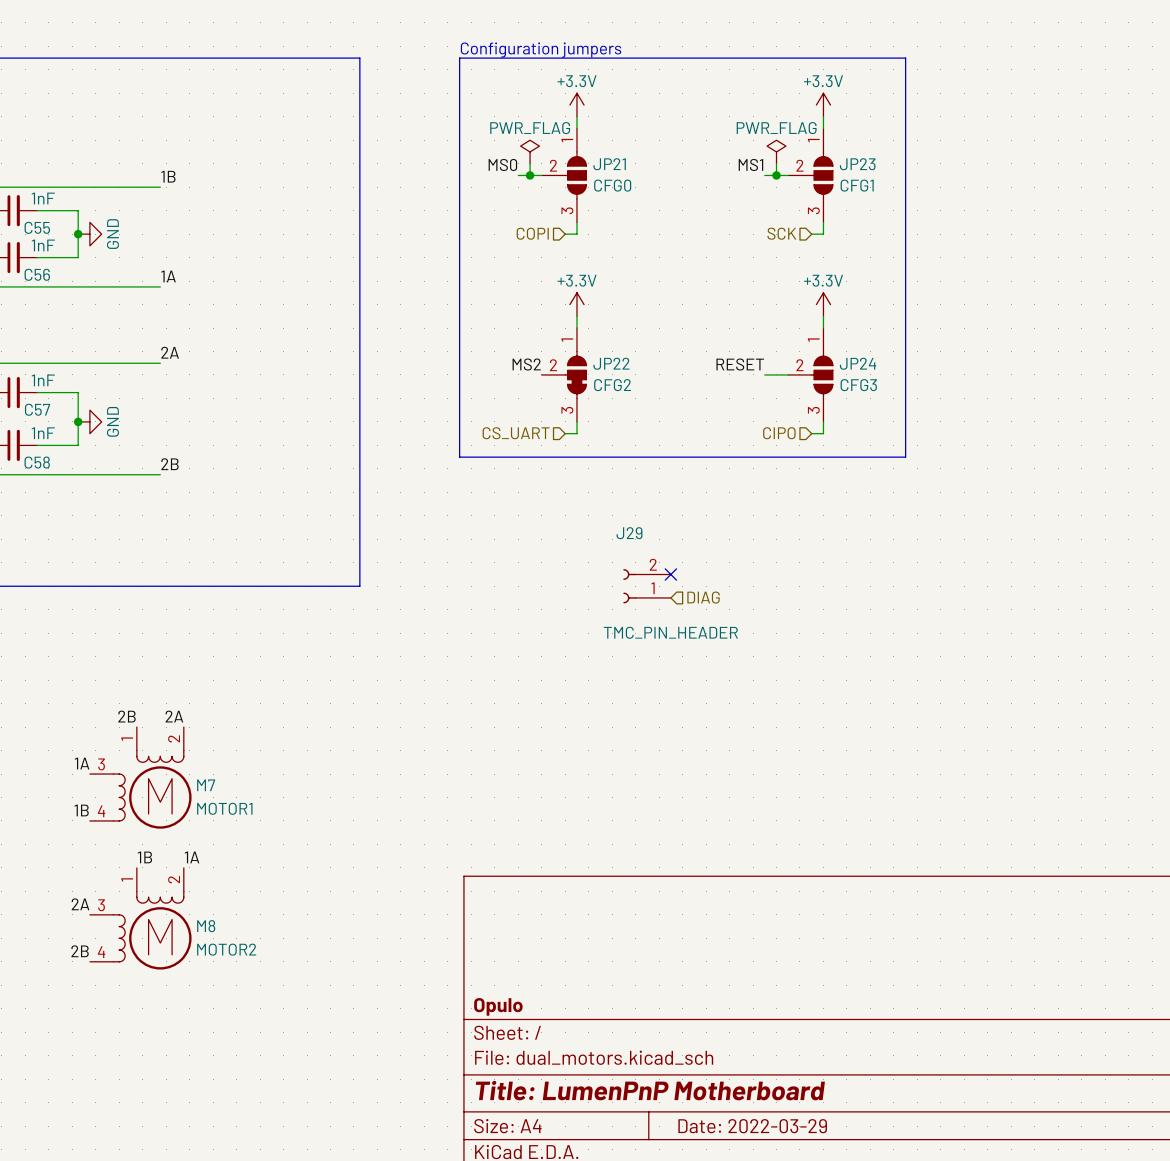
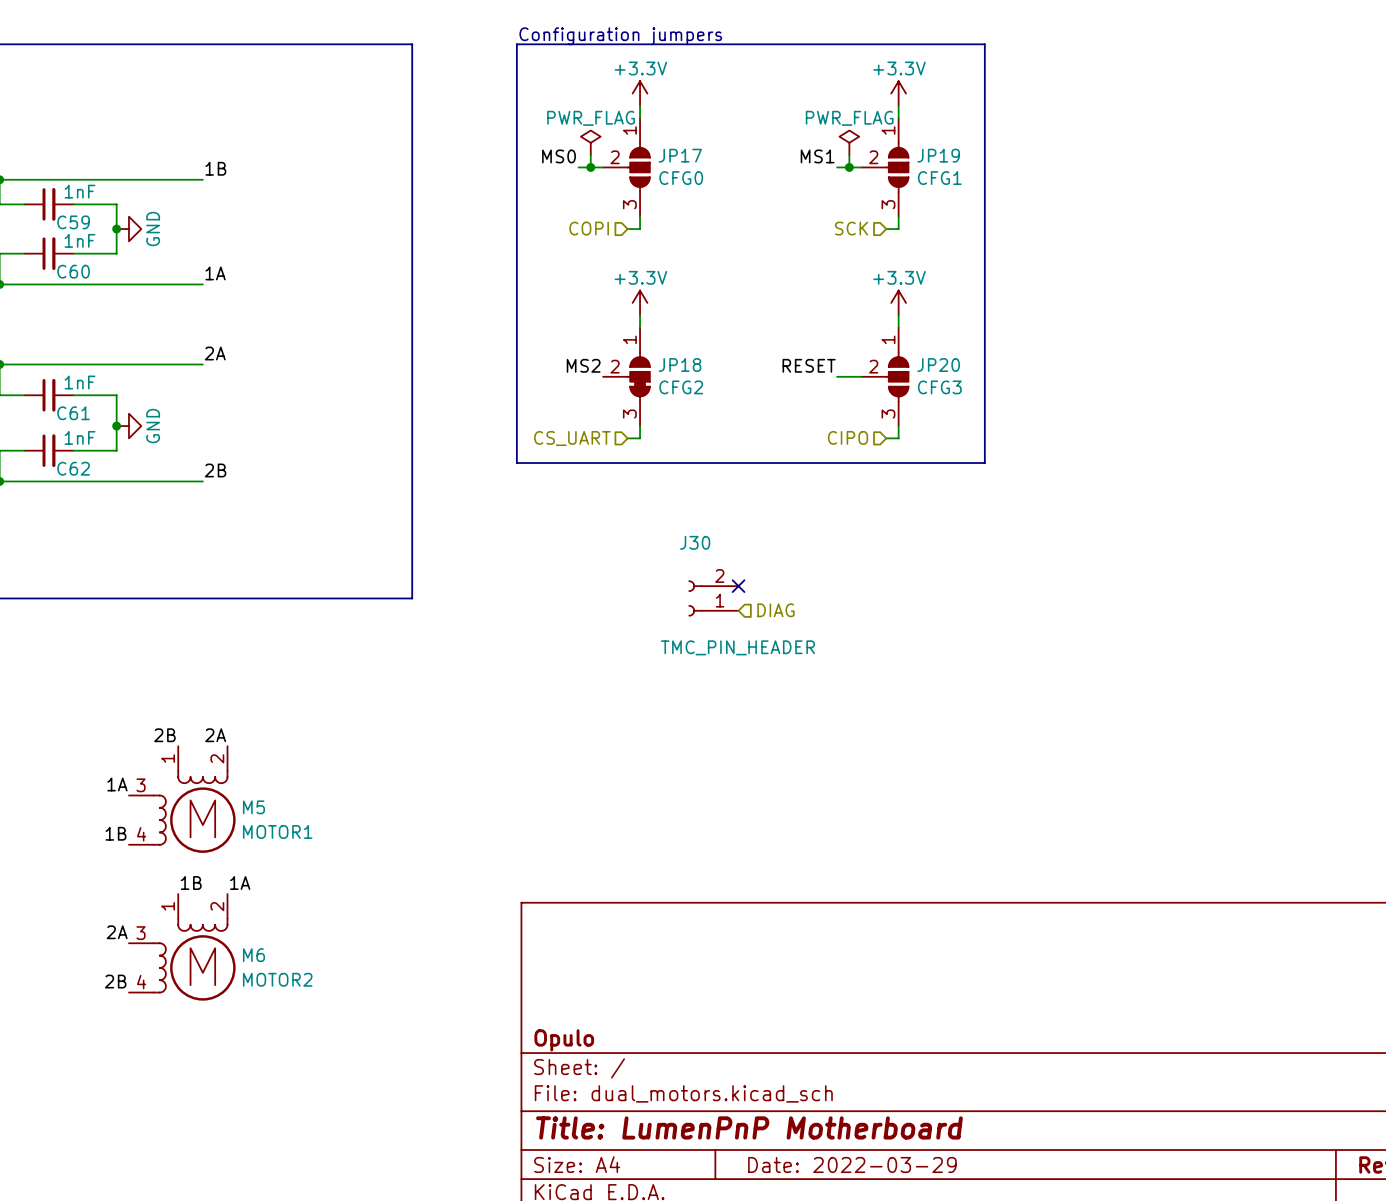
JP21 name: JP21 (609, 164) -> JP17 (680, 155)
JP23 name: JP23 (857, 164) -> JP19 (938, 155)
C55 name: C55 (37, 227) -> C59 (73, 222)
C56 name: C56 (37, 274) -> C60 (73, 271)
JP22 name: JP22 (611, 363) -> JP18 (680, 365)
JP24 name: JP24 (858, 363) -> JP20 (938, 365)
C57 name: C57 (37, 409) -> C61 (73, 413)
C58 name: C58 (37, 462) -> C62 (73, 468)
J29 name: J29 (629, 533) -> J30 (695, 542)
M7 name: M7 (206, 785) -> M5 (253, 807)
M8 name: M8 (206, 926) -> M6 (253, 955)

